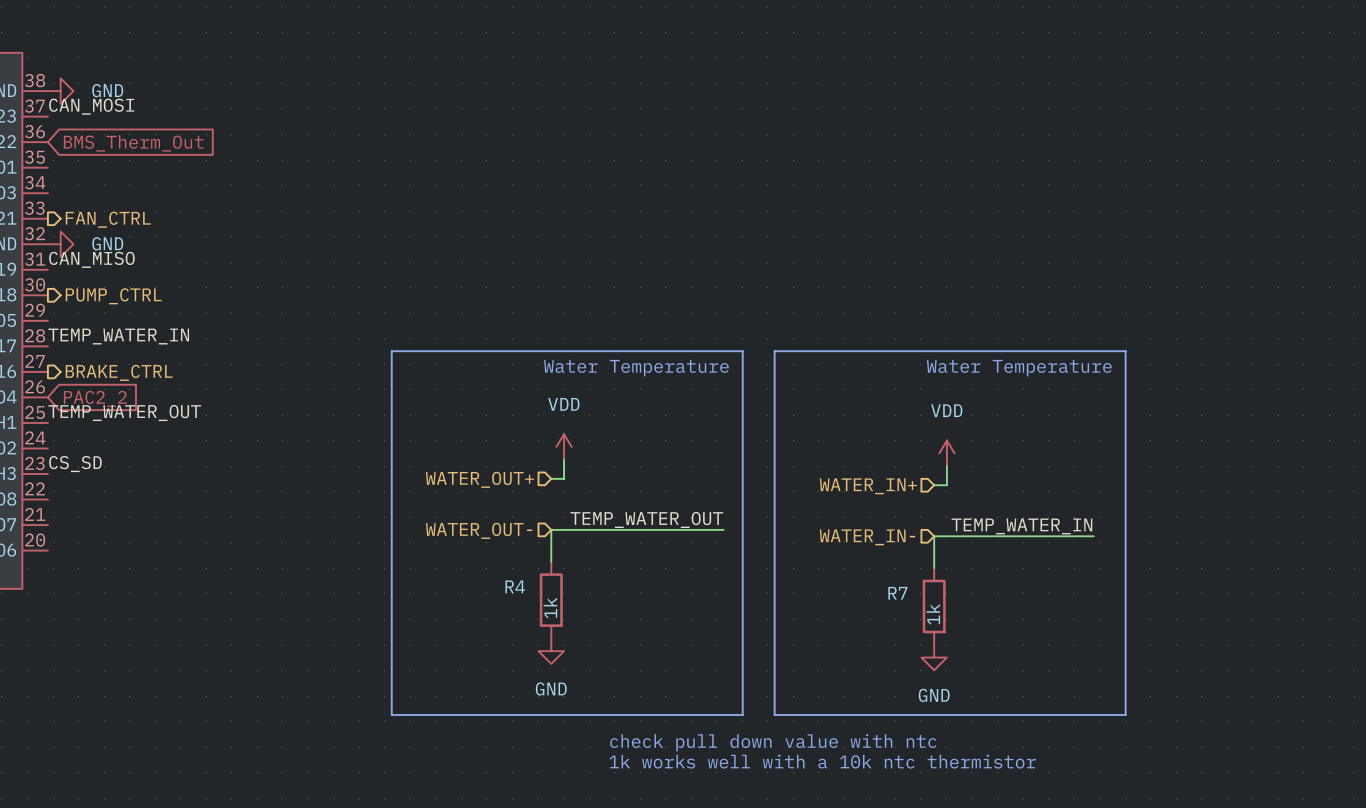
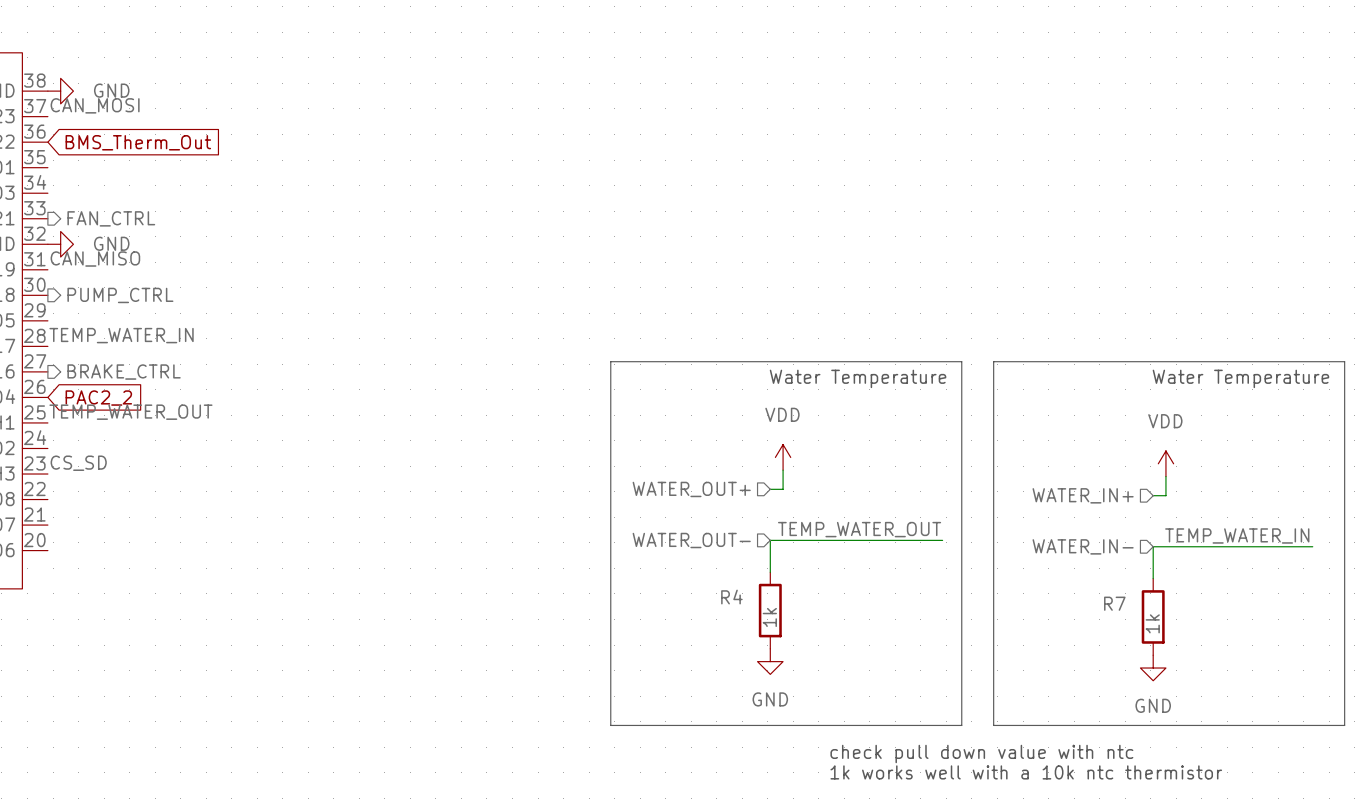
line: (391, 351) (742, 351) (742, 714) (391, 714) (391, 351) -> (610, 361) (961, 361) (961, 725) (610, 725) (610, 361)
line: (774, 351) (1125, 351) (1125, 714) (774, 714) (774, 351) -> (993, 361) (1344, 361) (1344, 725) (993, 725) (993, 361)
text: Water Temperature (636, 368) -> none
text position: Water Temperature (1019, 368) -> Water Temperature (858, 378)
text: none -> Water Temperature (1240, 378)
power symbol: VDD (564, 446) -> none
power symbol: VDD (946, 453) -> none
power symbol: none -> VDD (783, 457)
wire: (564, 459) (564, 478) (551, 478) -> (783, 470) (783, 489) (770, 489)
power symbol: none -> VDD (1165, 463)
wire: (946, 466) (946, 485) (934, 485) -> (1165, 476) (1165, 495) (1153, 495)
hierarchical label position: WATER_OUT+ (479, 479) -> WATER_OUT+ (691, 489)
hierarchical label position: WATER_IN+ (868, 486) -> WATER_IN+ (1083, 495)
label position: TEMP_WATER_OUT (646, 519) -> TEMP_WATER_OUT (859, 529)
label position: TEMP_WATER_IN (1021, 526) -> TEMP_WATER_IN (1237, 535)
wire: (723, 529) (551, 529) (551, 561) -> (942, 540) (770, 540) (770, 572)
hierarchical label position: WATER_OUT- (479, 530) -> WATER_OUT- (691, 540)
wire: (1093, 536) (934, 536) (934, 568) -> (1312, 546) (1153, 546) (1153, 578)
hierarchical label position: WATER_IN- (867, 537) -> WATER_IN- (1083, 546)
R4 position: (551, 600) -> (770, 610)
R7 position: (934, 606) -> (1153, 616)
power symbol: GND (551, 651) -> none
power symbol: GND (934, 657) -> none
power symbol: none -> GND (770, 661)
power symbol: none -> GND (1153, 668)
text position: check pull down value with ntc (773, 742) -> check pull down value with ntc (981, 754)
text position: 1k works well with a 10k ntc thermistor (822, 761) -> 1k works well with a 10k ntc thermistor (1026, 772)

